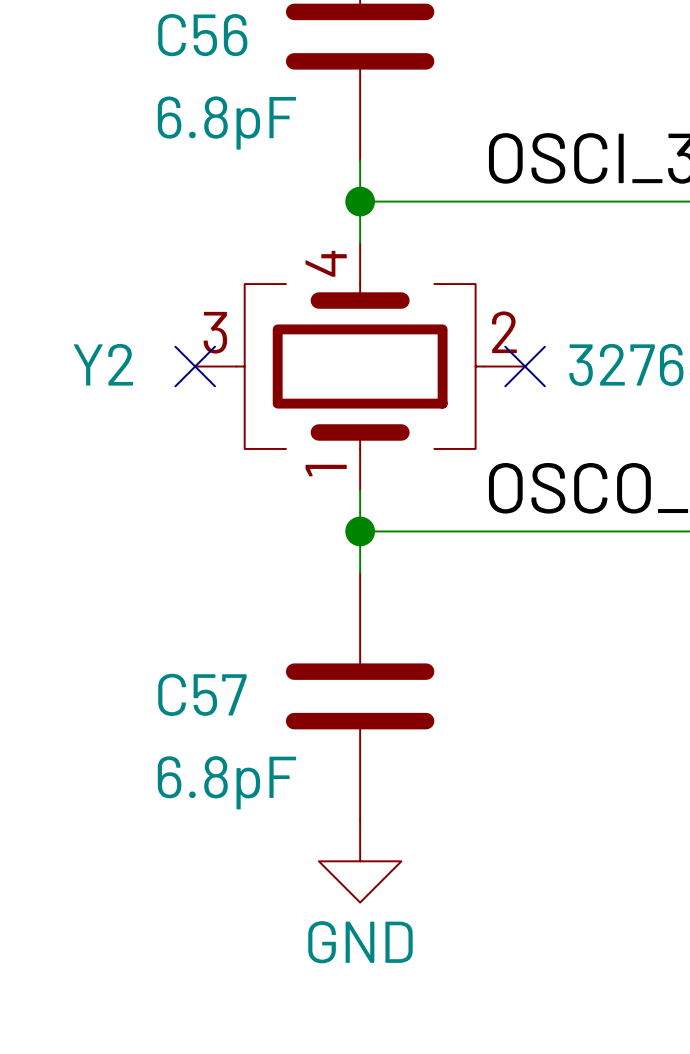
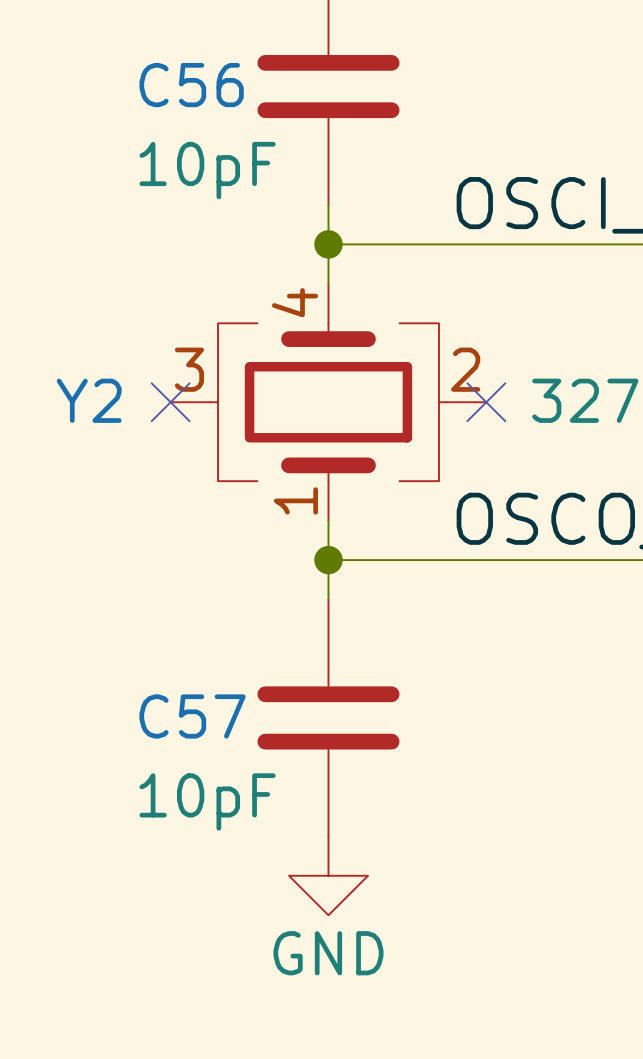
C56 value: 6.8pF (226, 122) -> 10pF (207, 170)
C57 value: 6.8pF (226, 782) -> 10pF (207, 801)

